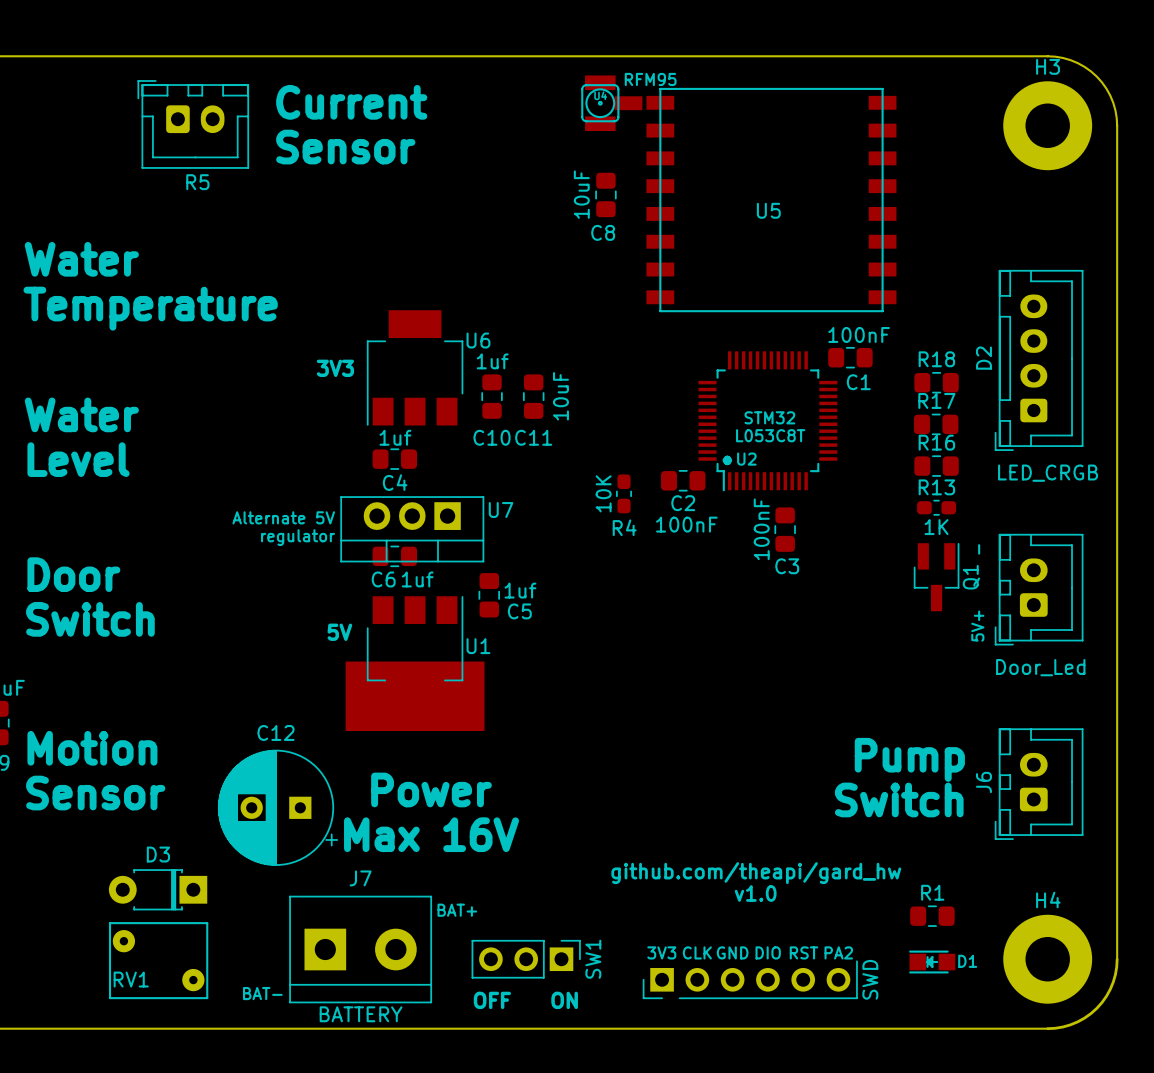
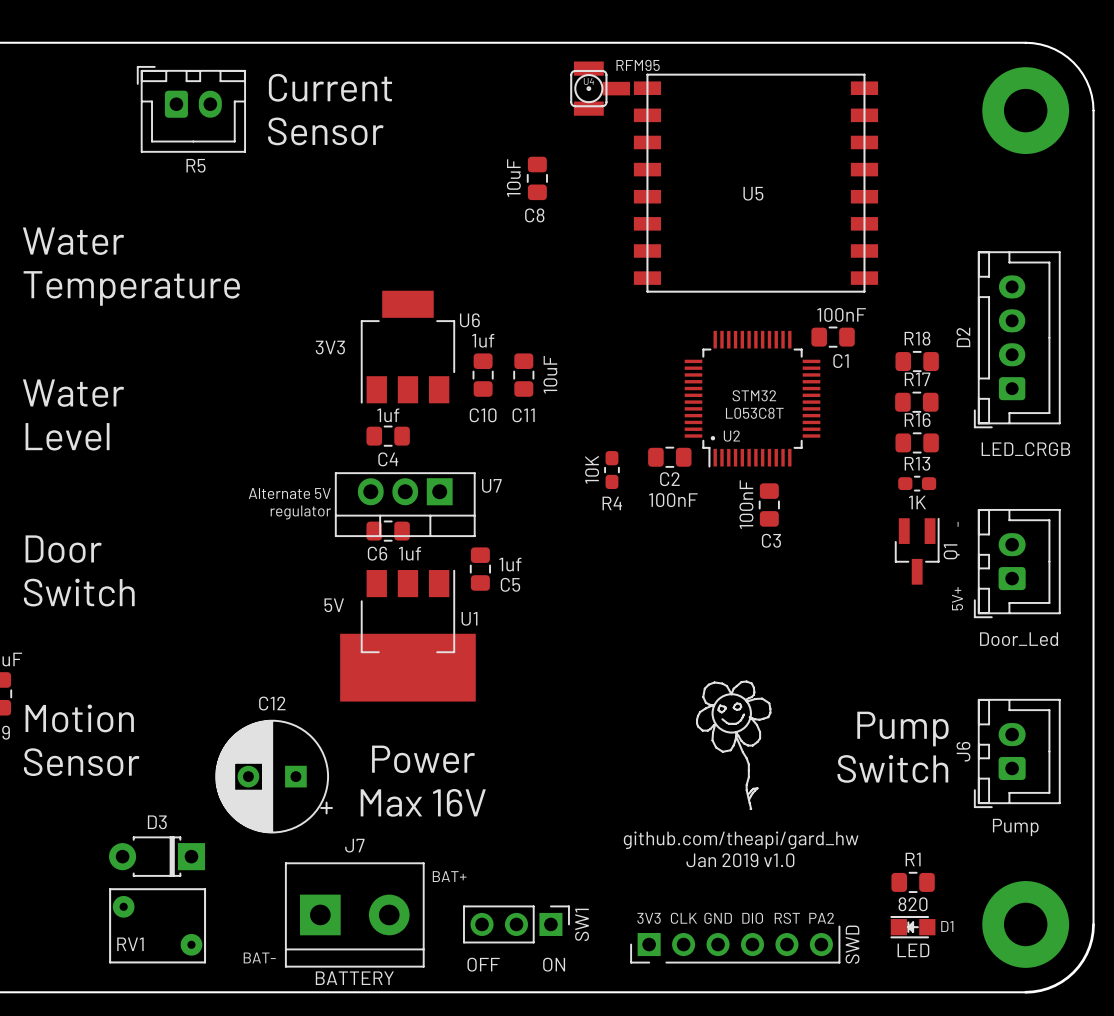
H3 name: H3 (1048, 66) -> none
C8 position: (605, 194) -> (537, 178)
drawing: none -> [696, 680, 772, 811]
J6 value: none -> Pump (1015, 827)
text: v1.0 (755, 893) -> Jan 2019 v1.0 (740, 860)
H4 name: H4 (1048, 900) -> none
R1 value: none -> 820 (912, 904)
D1 value: none -> LED (913, 950)

